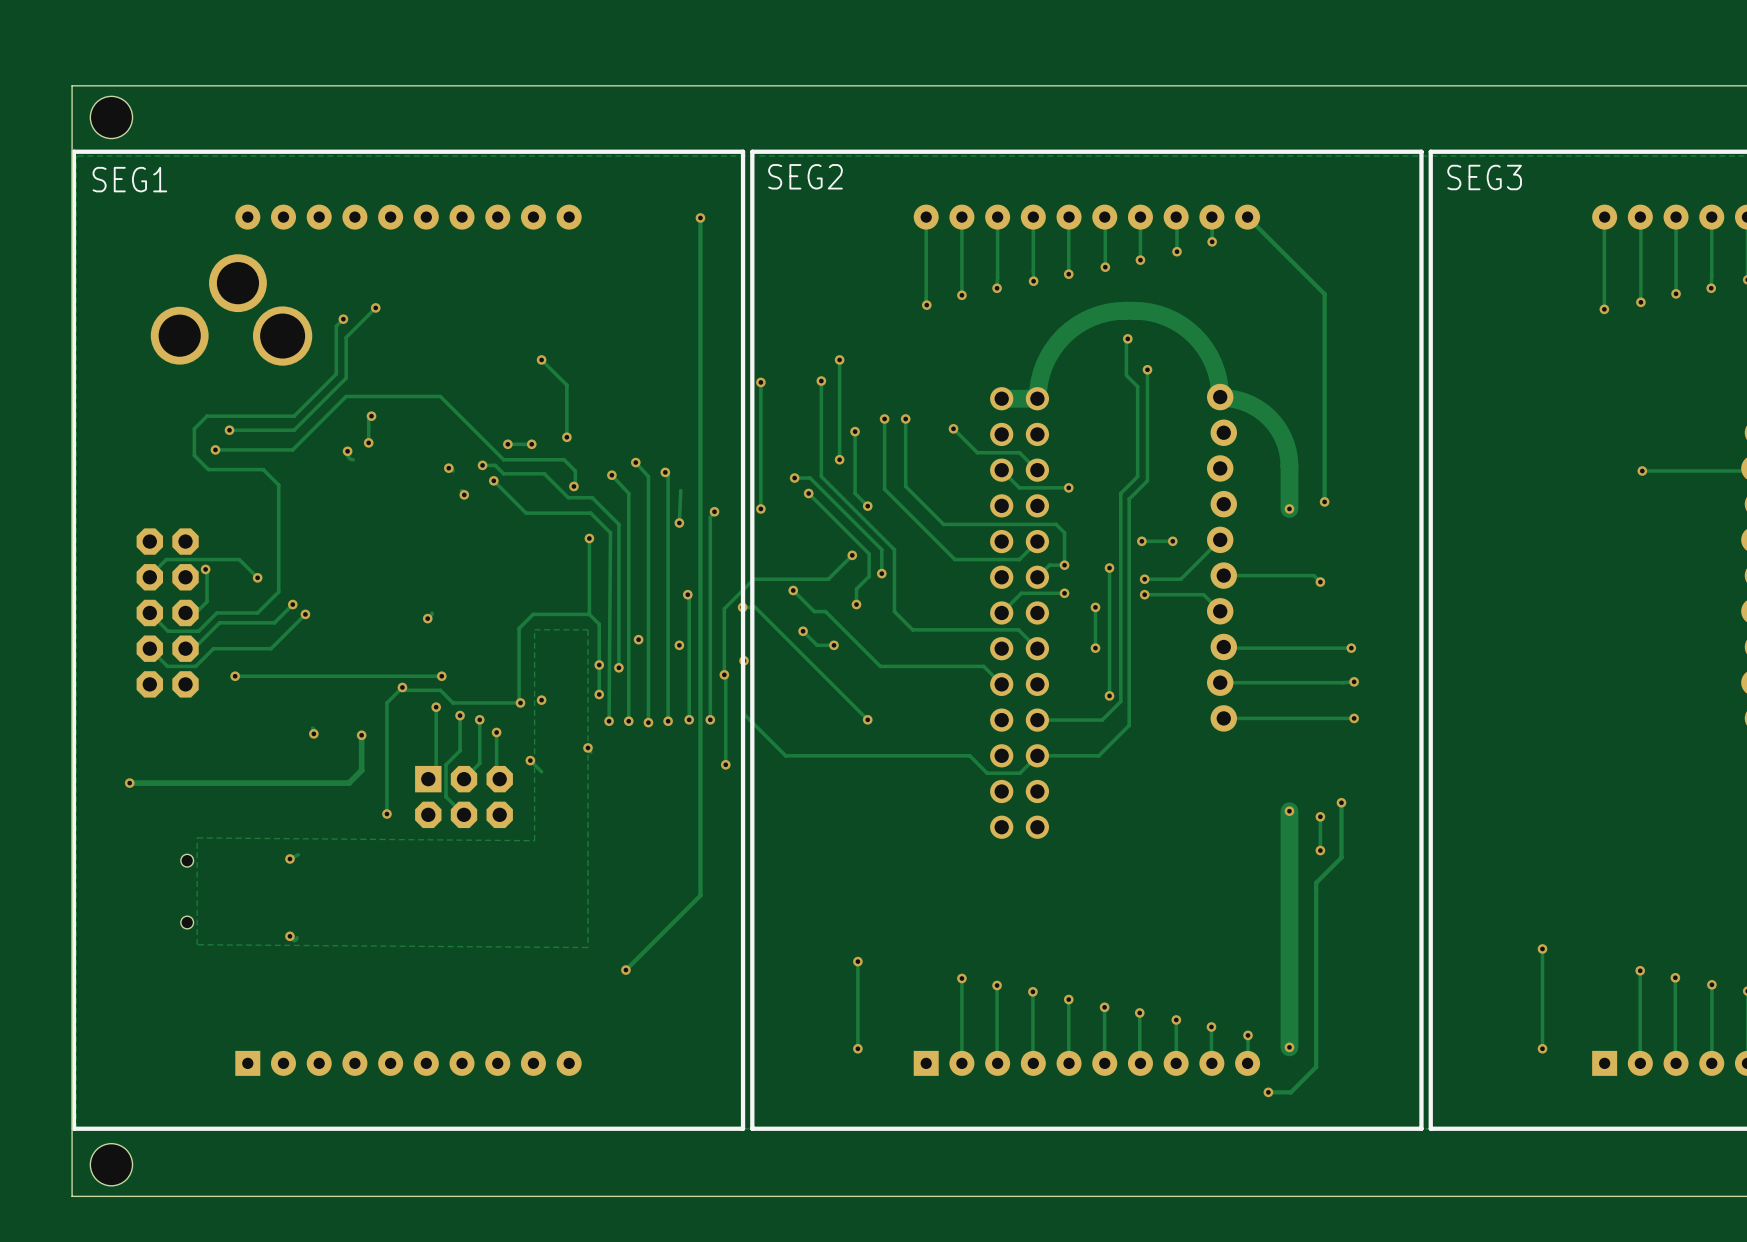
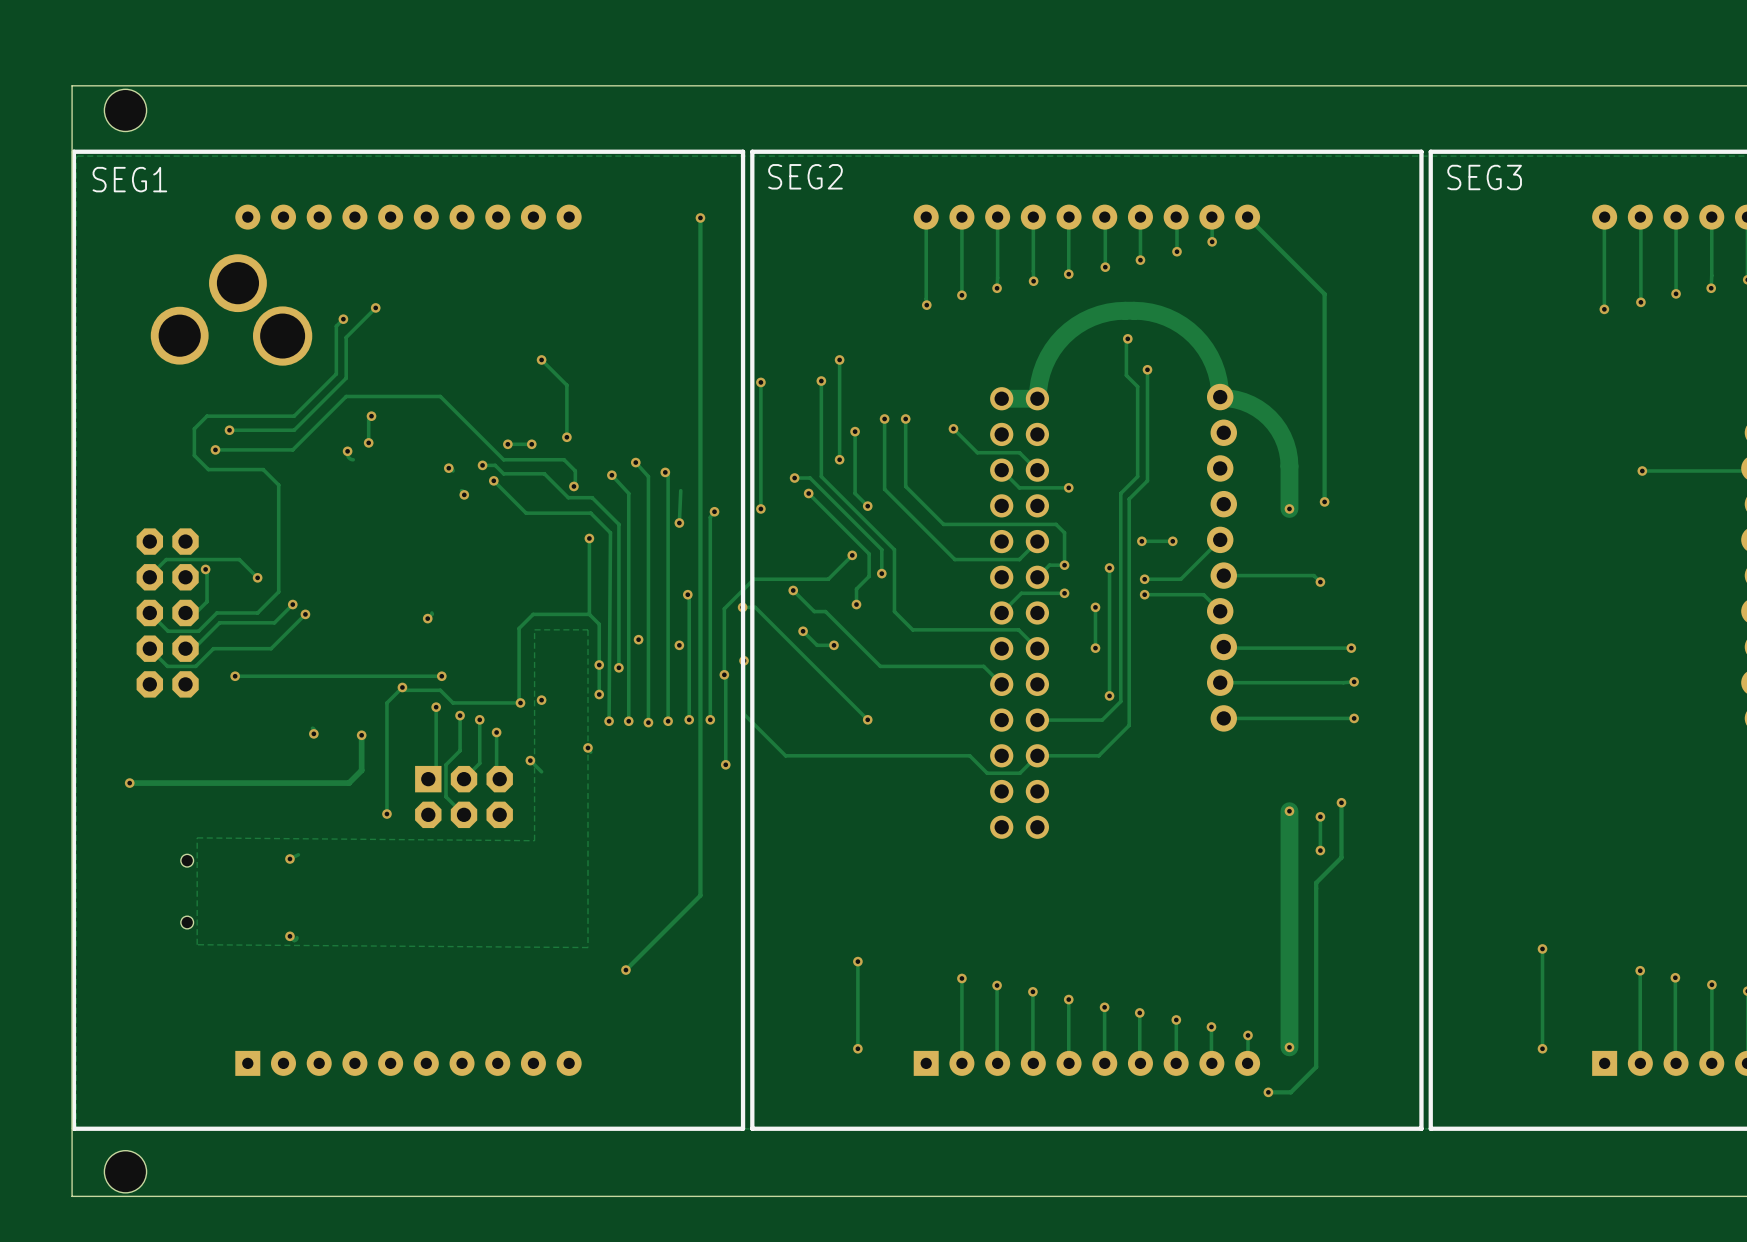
hole position: (111, 117) -> (125, 110)
hole position: (111, 1164) -> (125, 1171)

